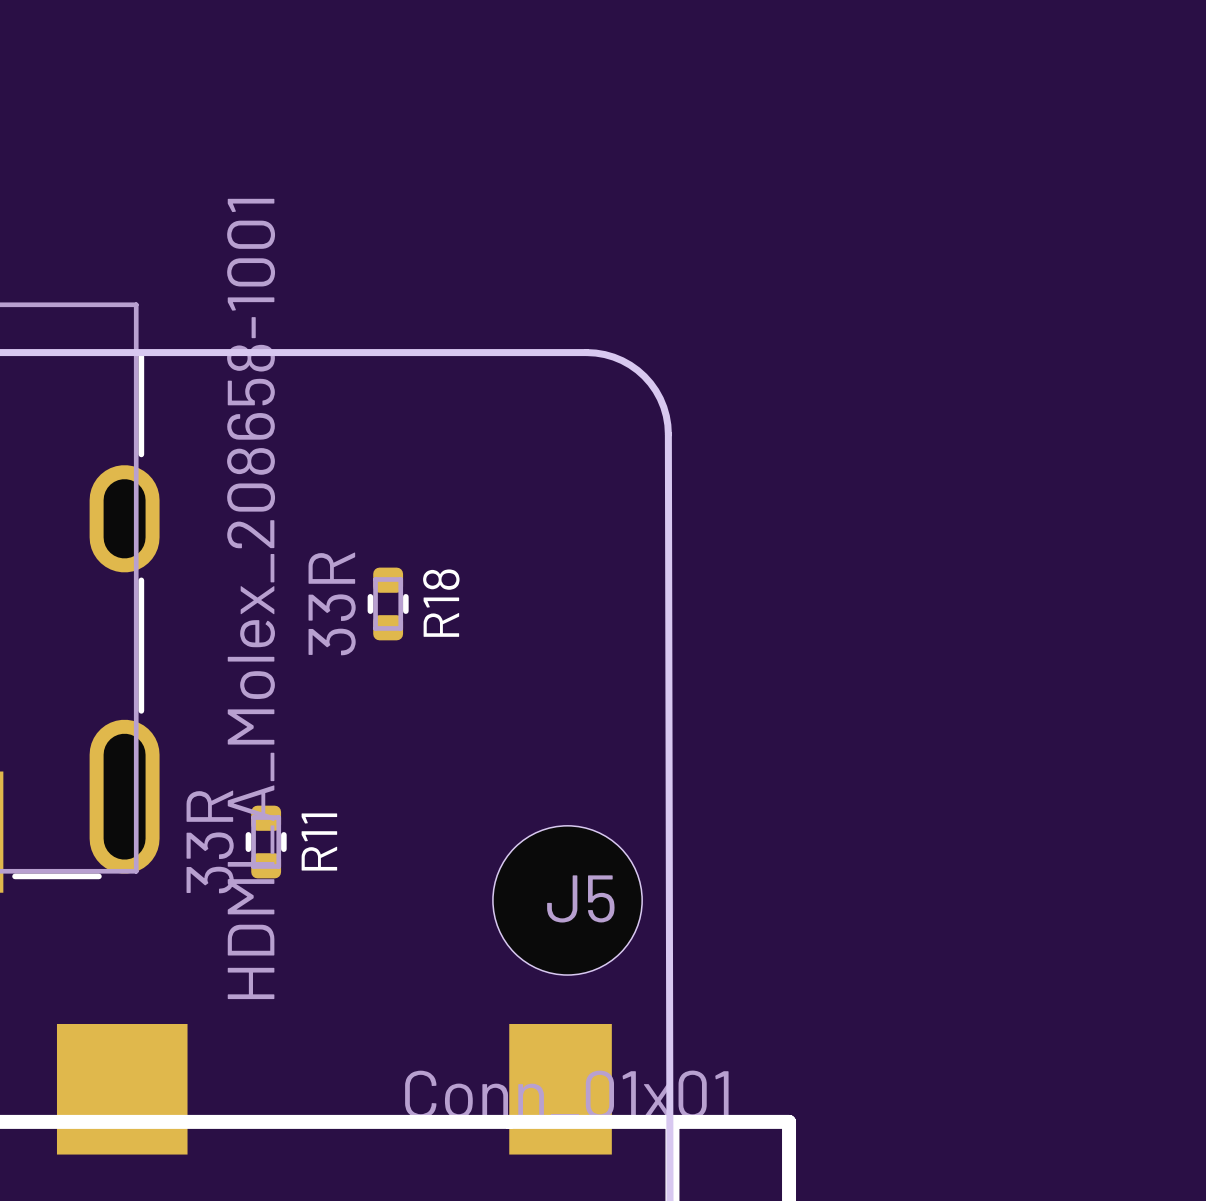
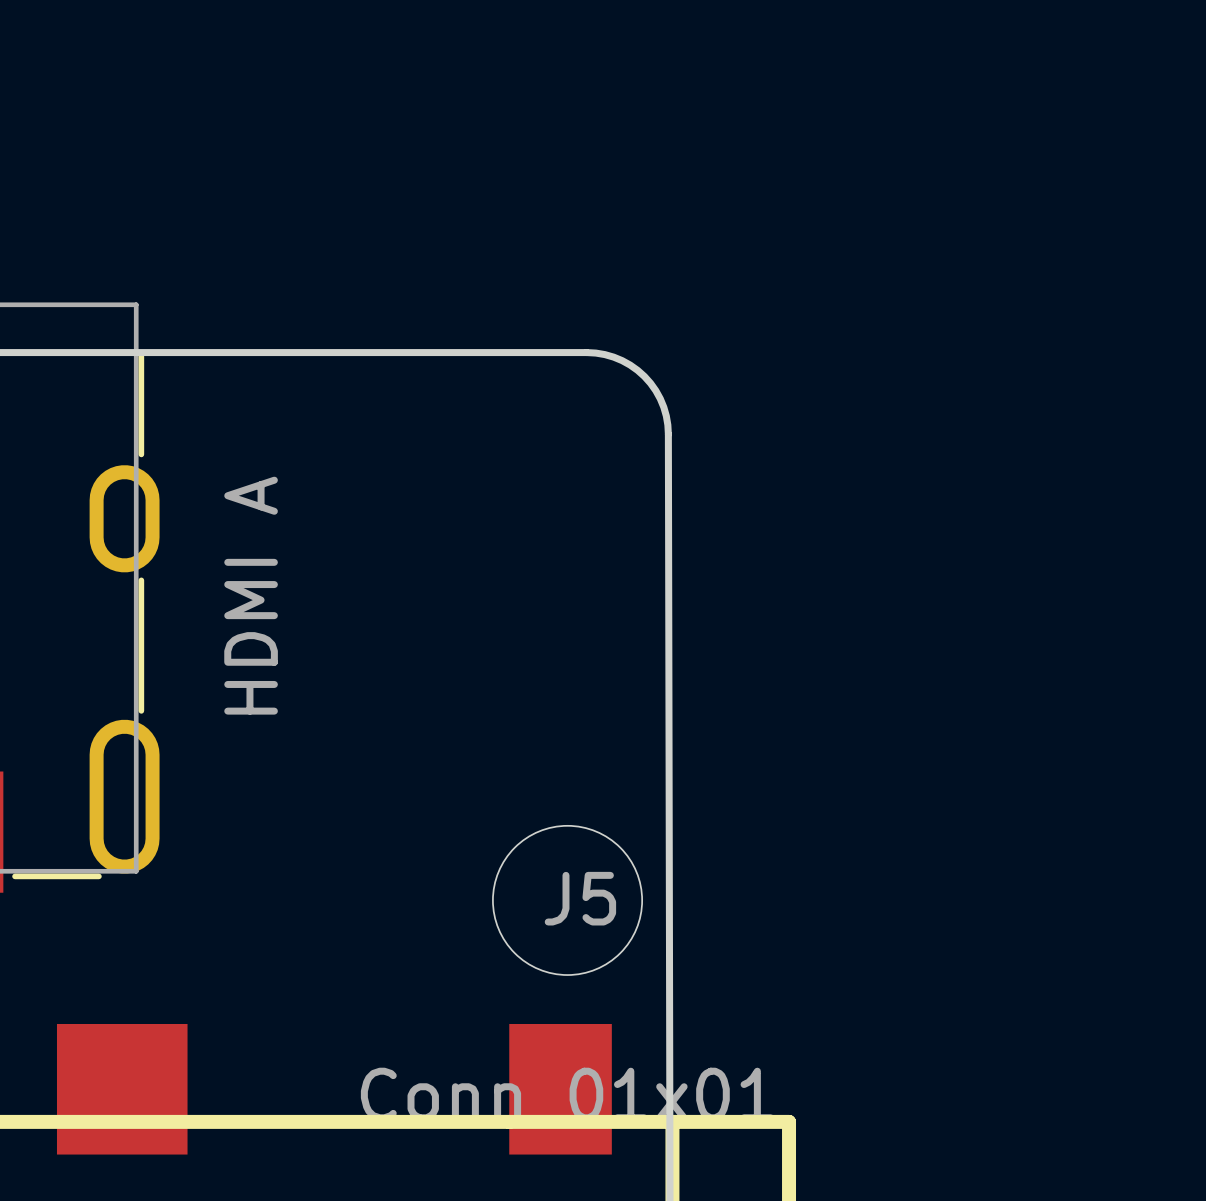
part value: HDMI_A_Molex_208658-1001 (251, 598) -> HDMI A (251, 595)
R18: 33R (388, 603) -> none
R11: 33R (266, 842) -> none

